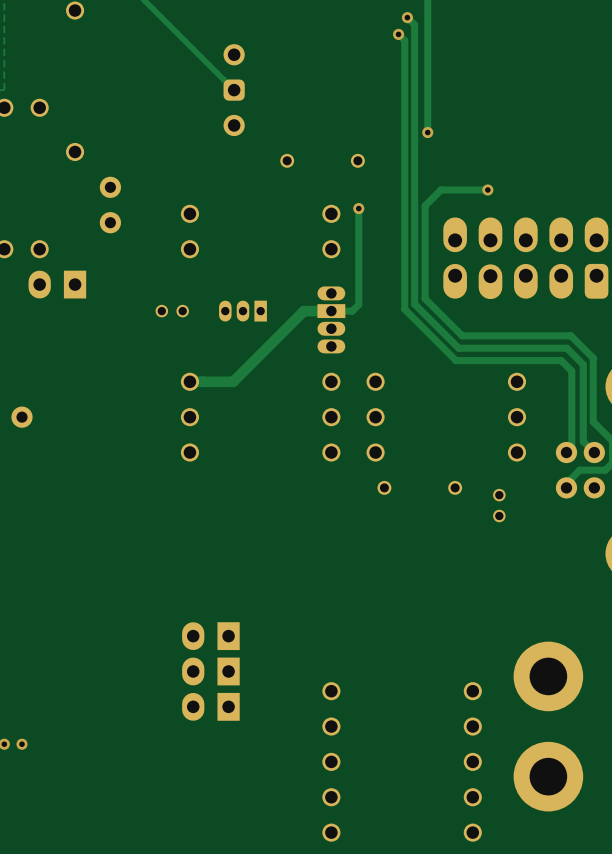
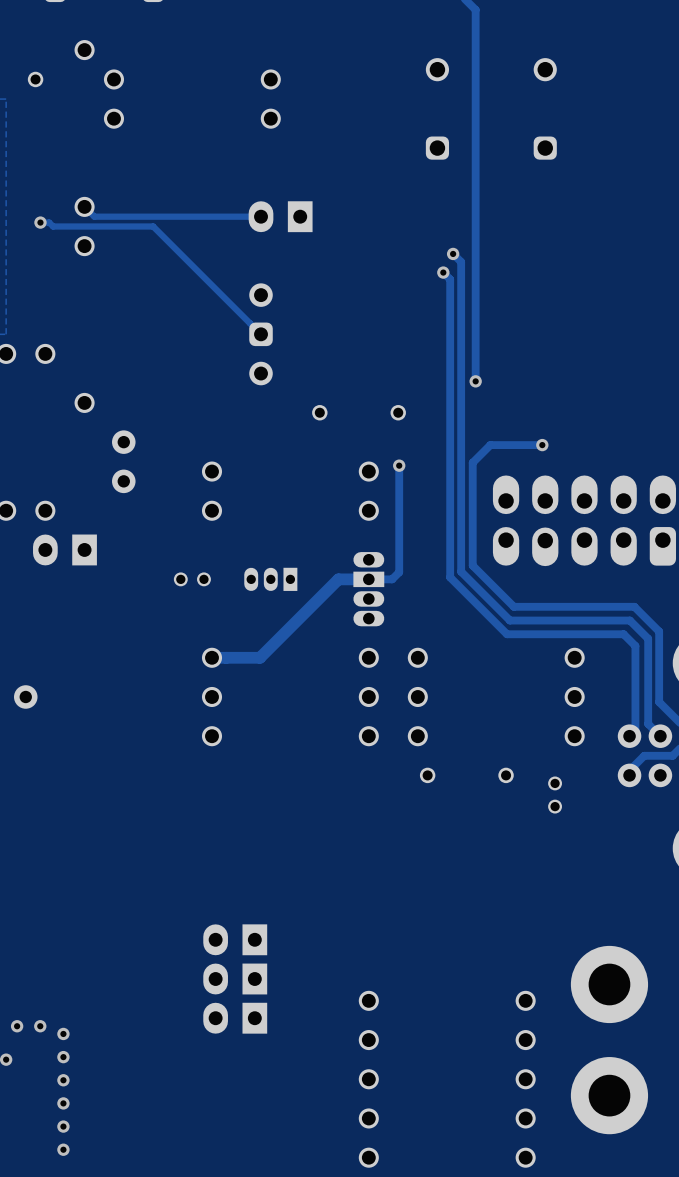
via: none -> (17, 1026)
via: none -> (40, 1026)
via: none -> (63, 1033)
via: none -> (63, 1057)
via: (22, 744) -> none
via: none -> (63, 1080)
via: none -> (63, 1103)
via: none -> (63, 1126)
via: none -> (63, 1149)

